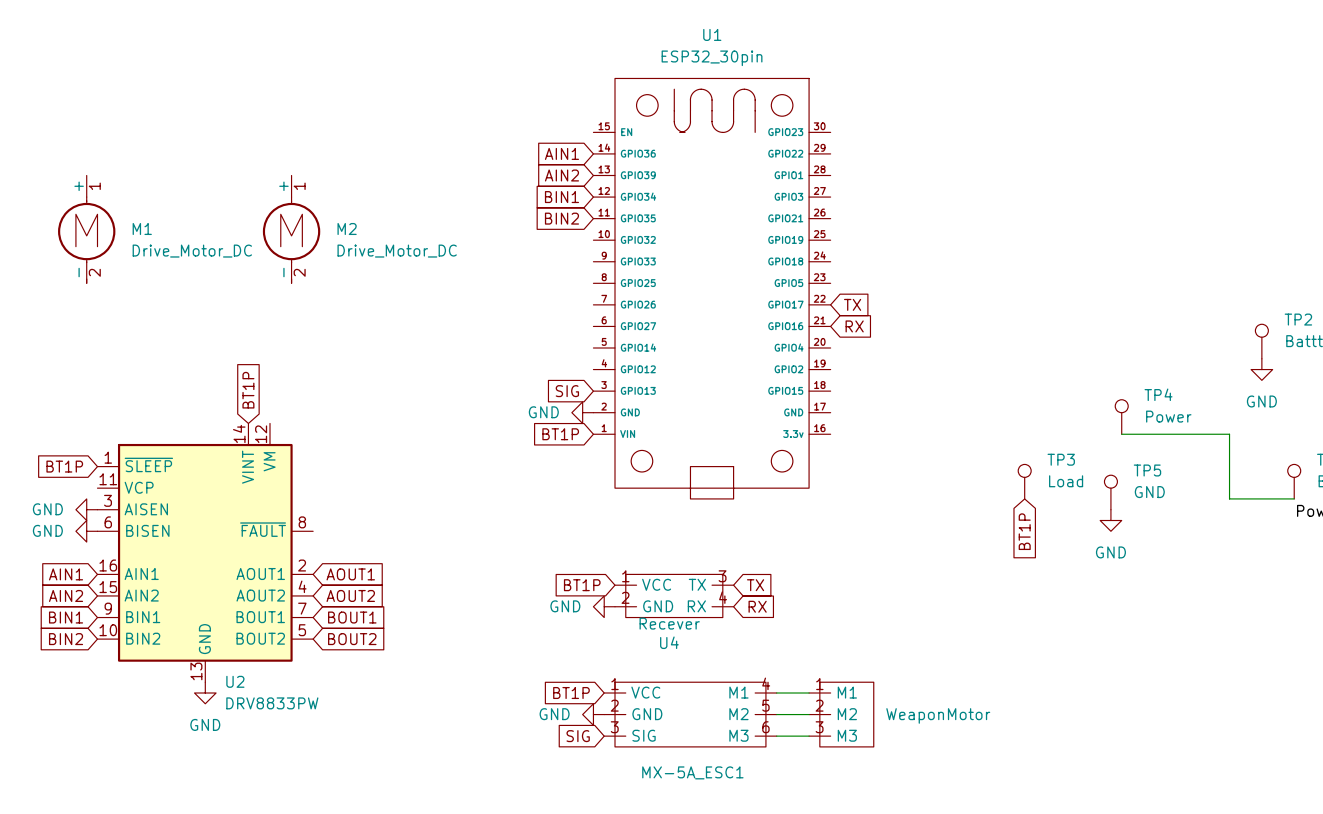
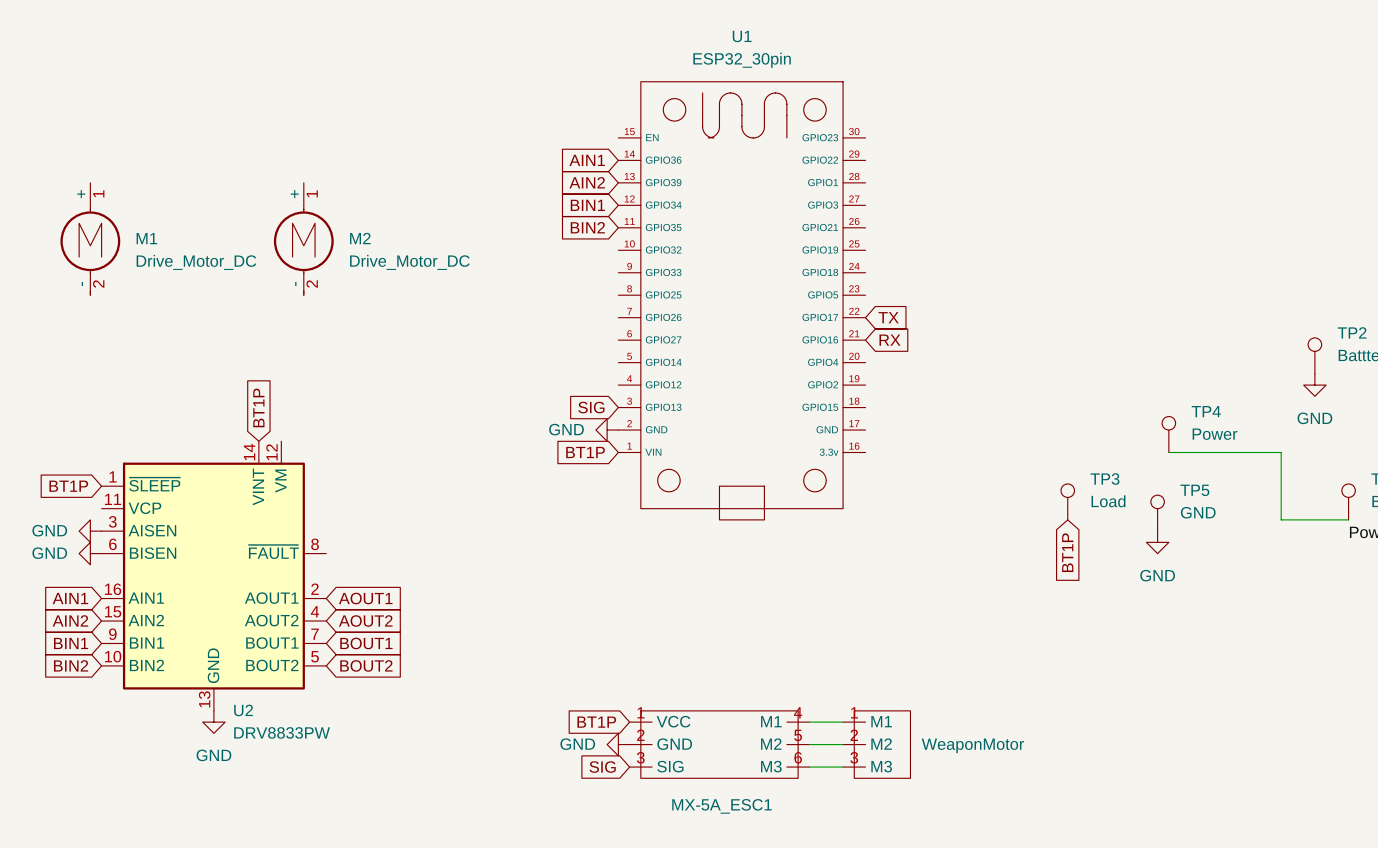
global label: BT1P (582, 585) -> none
global label: TX (755, 585) -> none
U4: Recever (674, 595) -> none
power symbol: GND (604, 606) -> none
global label: RX (757, 606) -> none

